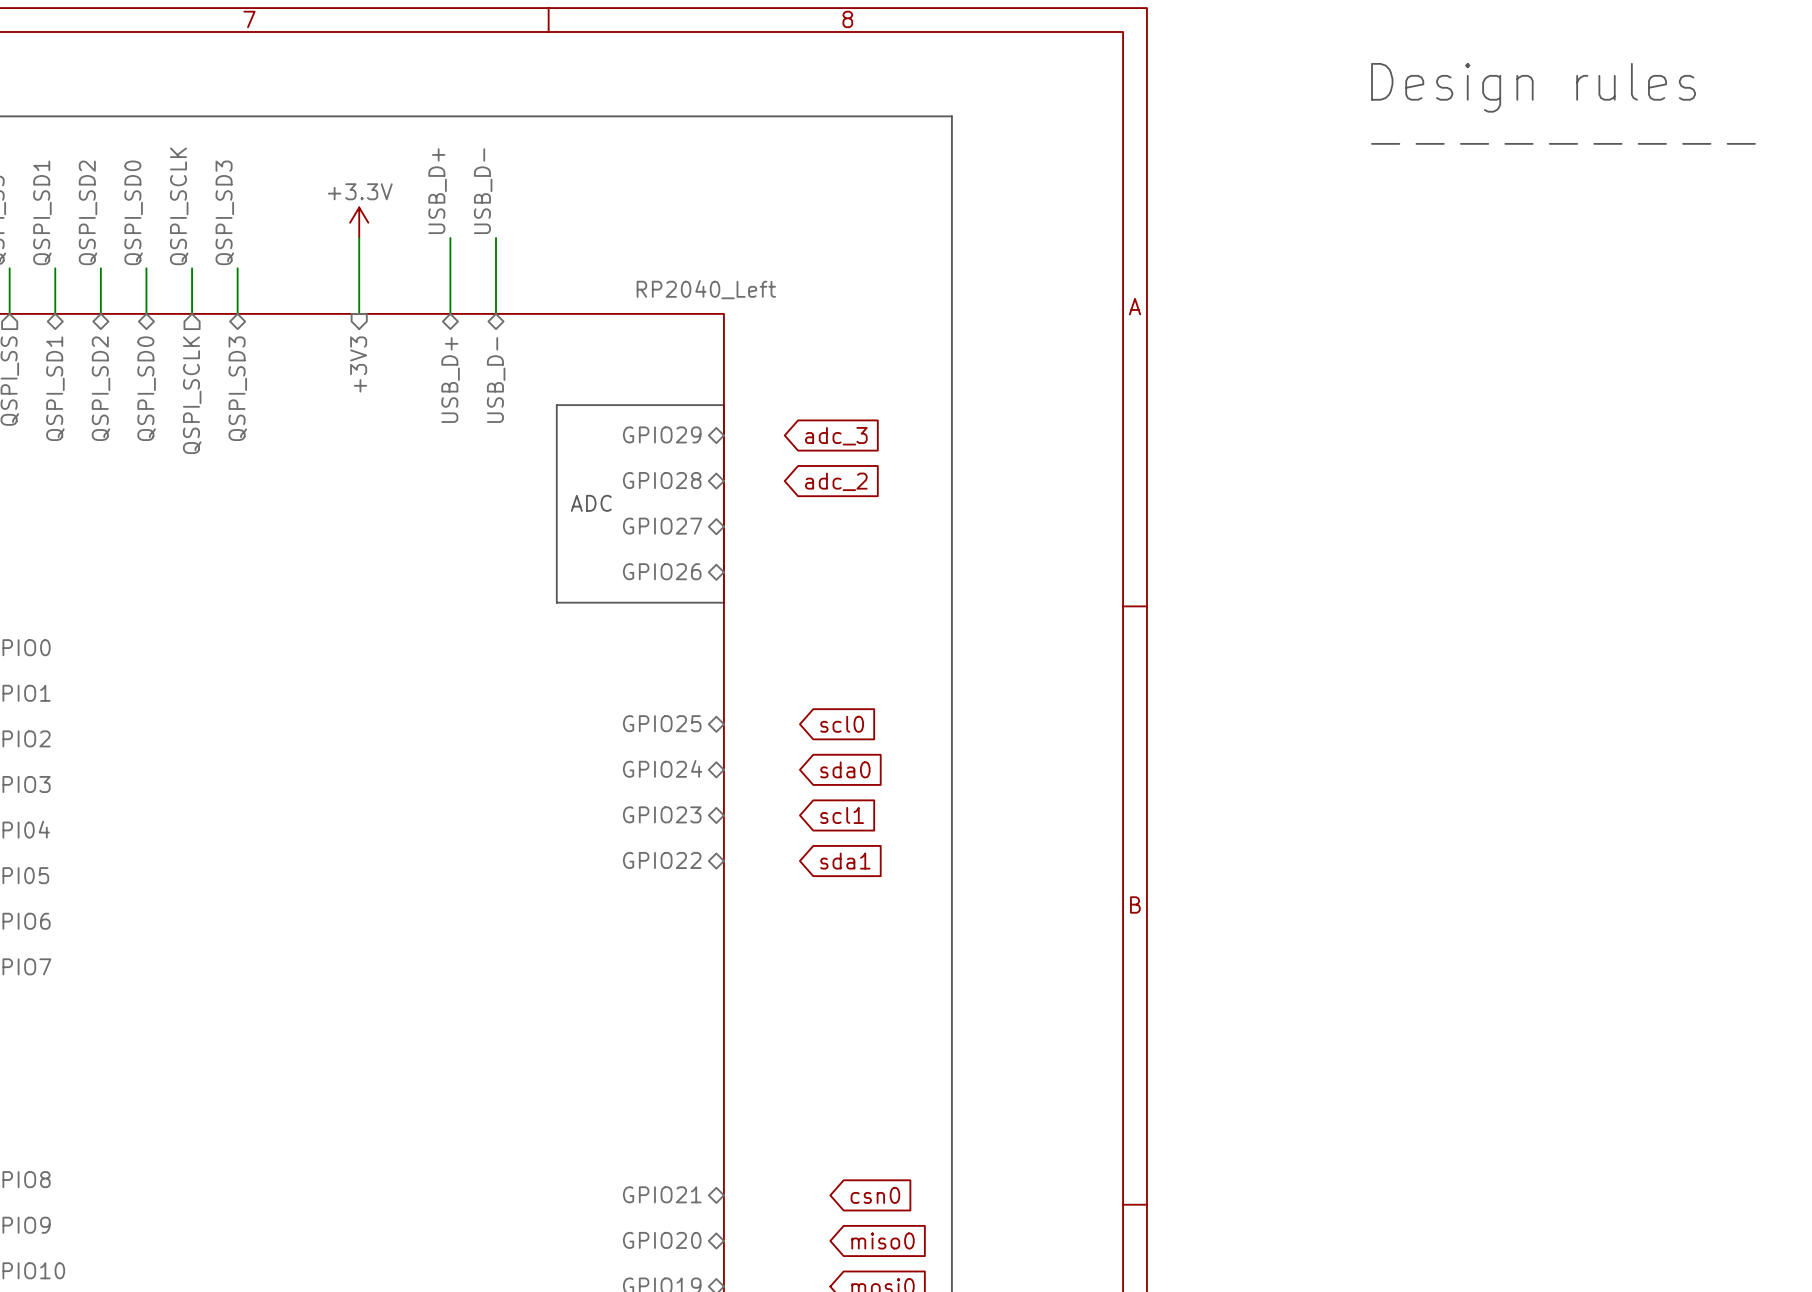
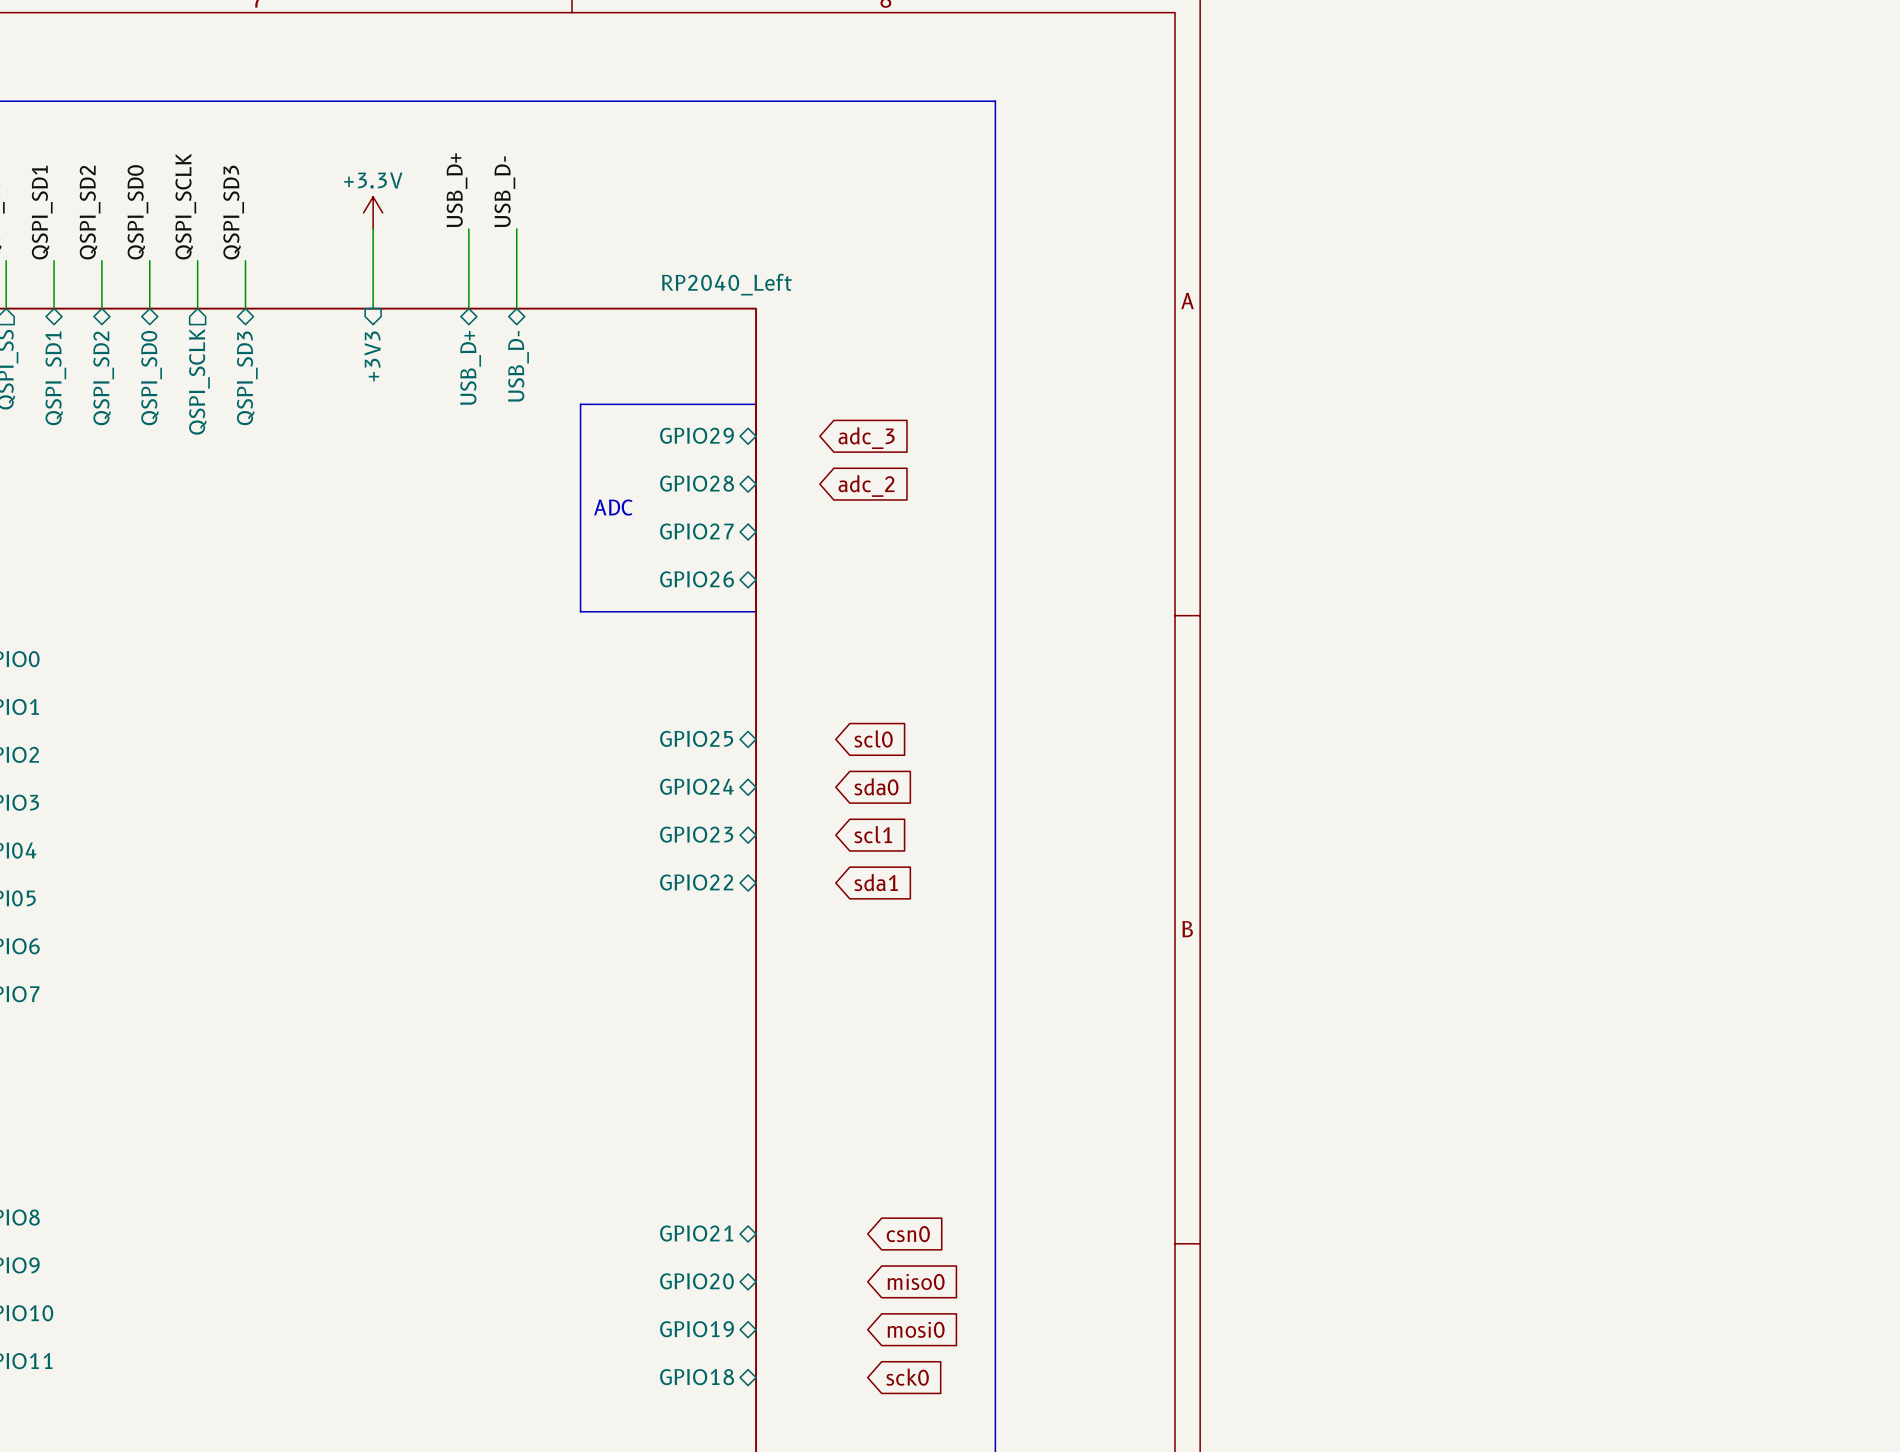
text: Design rules (1533, 87) -> none
text: --------- (1563, 143) -> none

